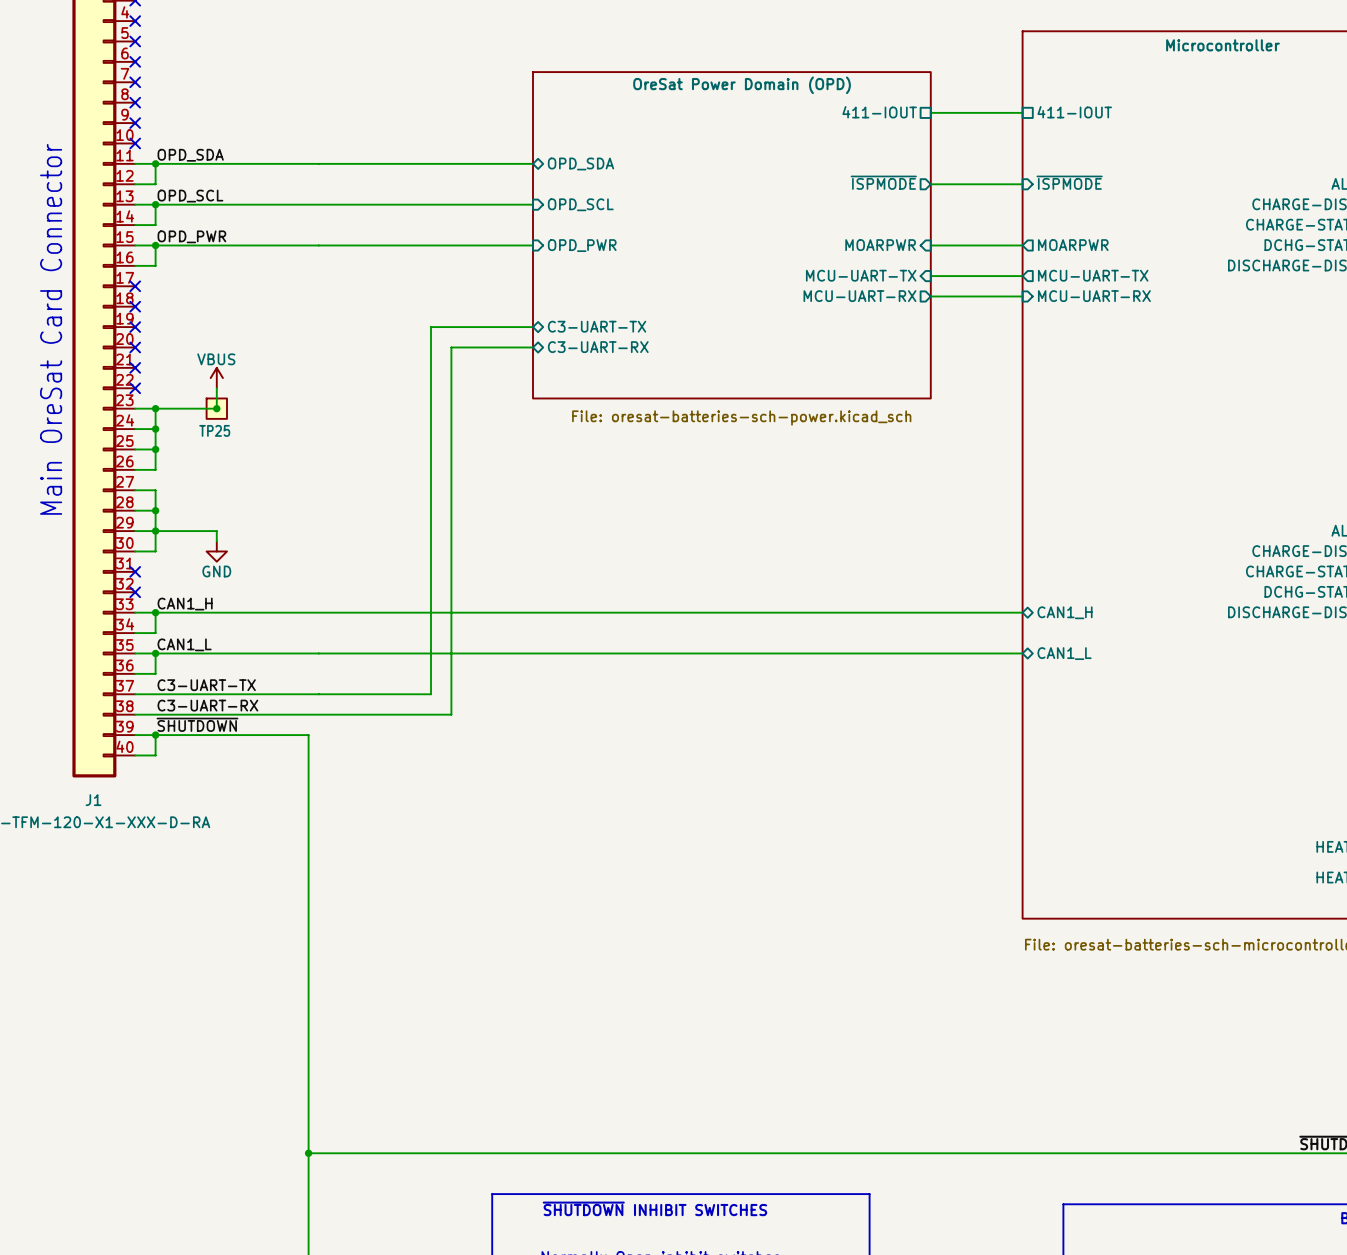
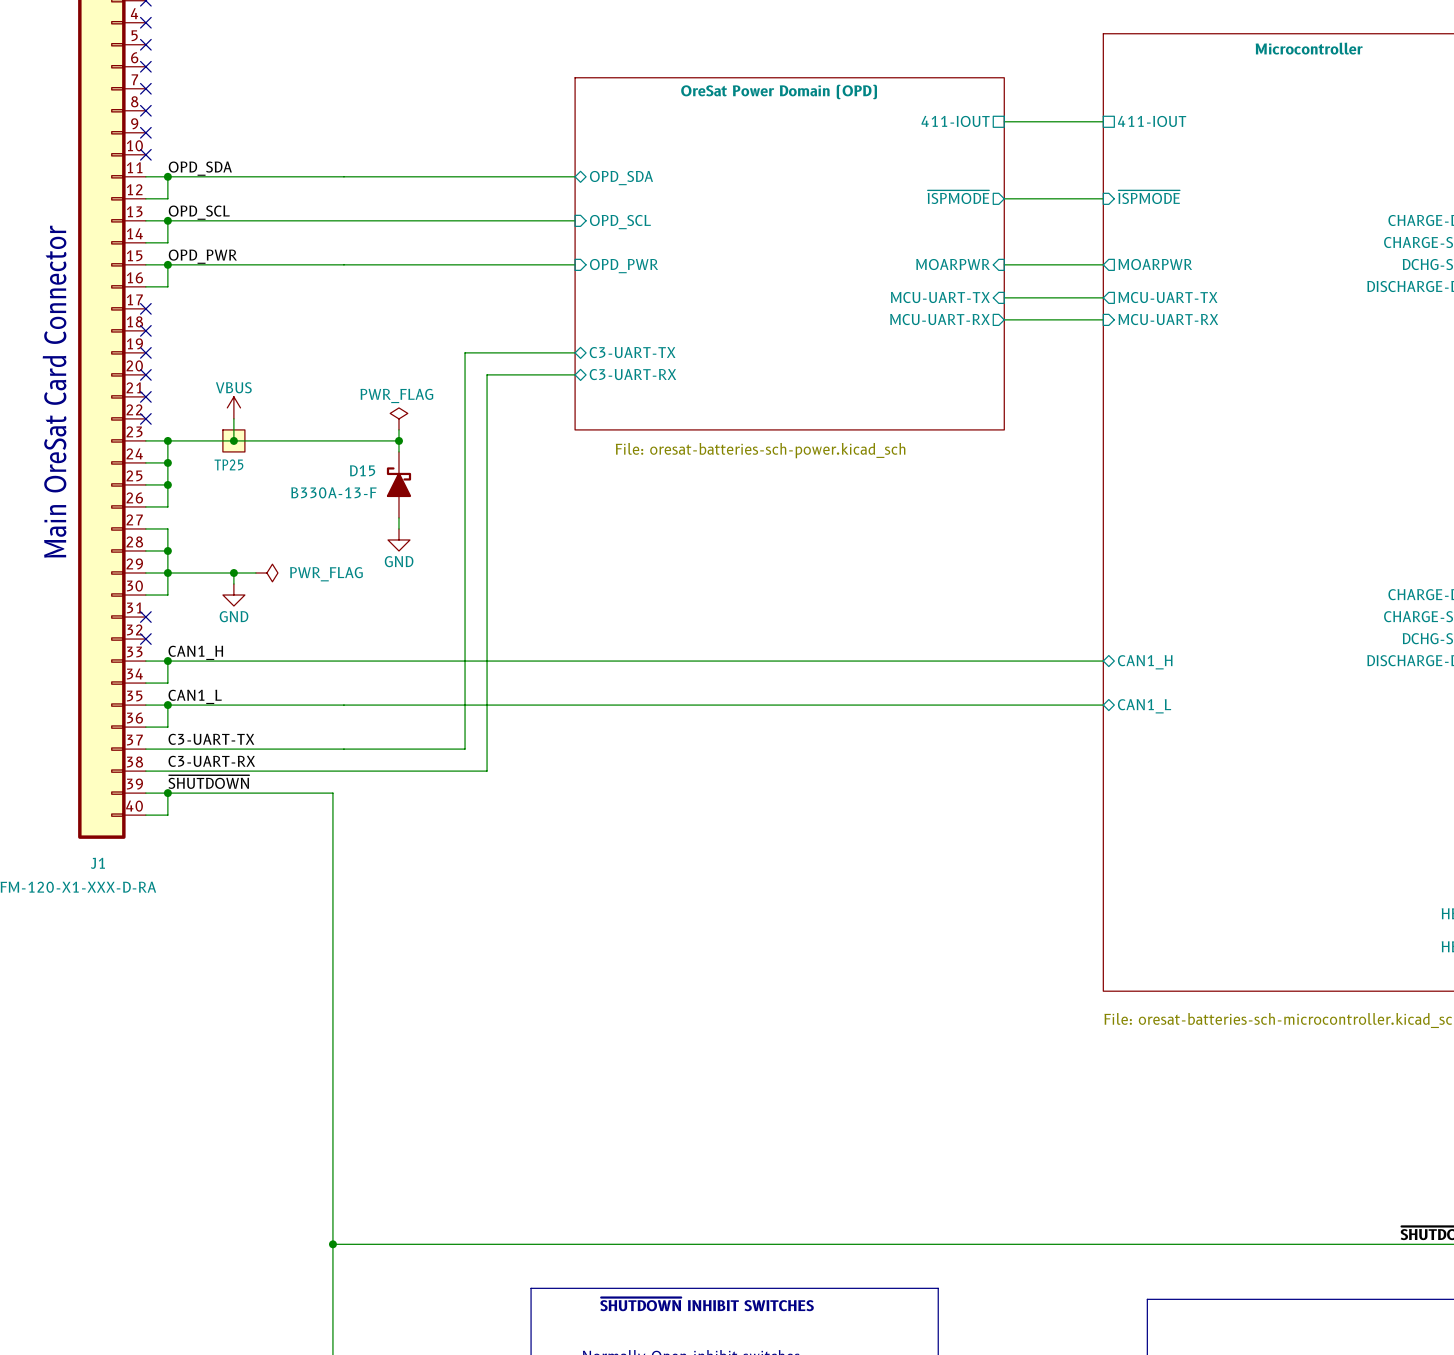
power symbol: none -> PWR_FLAG (398, 418)
wire: none -> (398, 429) (398, 451)
wire: none -> (233, 440) (398, 440)
junction: none -> (398, 440)
D15: none -> B330A-13-F (398, 484)
wire: none -> (398, 517) (398, 528)
power symbol: none -> GND (398, 539)
wire: none -> (233, 573) (255, 573)
junction: none -> (233, 573)
power symbol: none -> PWR_FLAG (266, 573)

